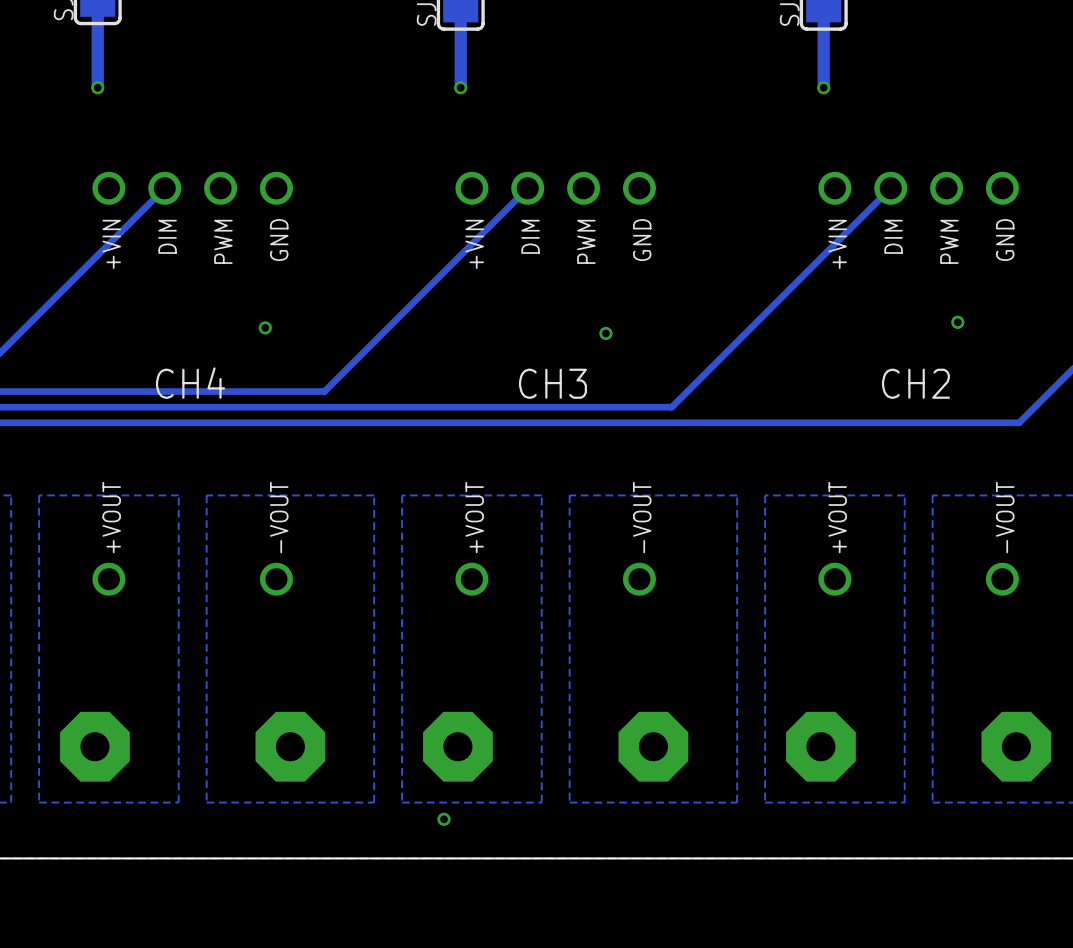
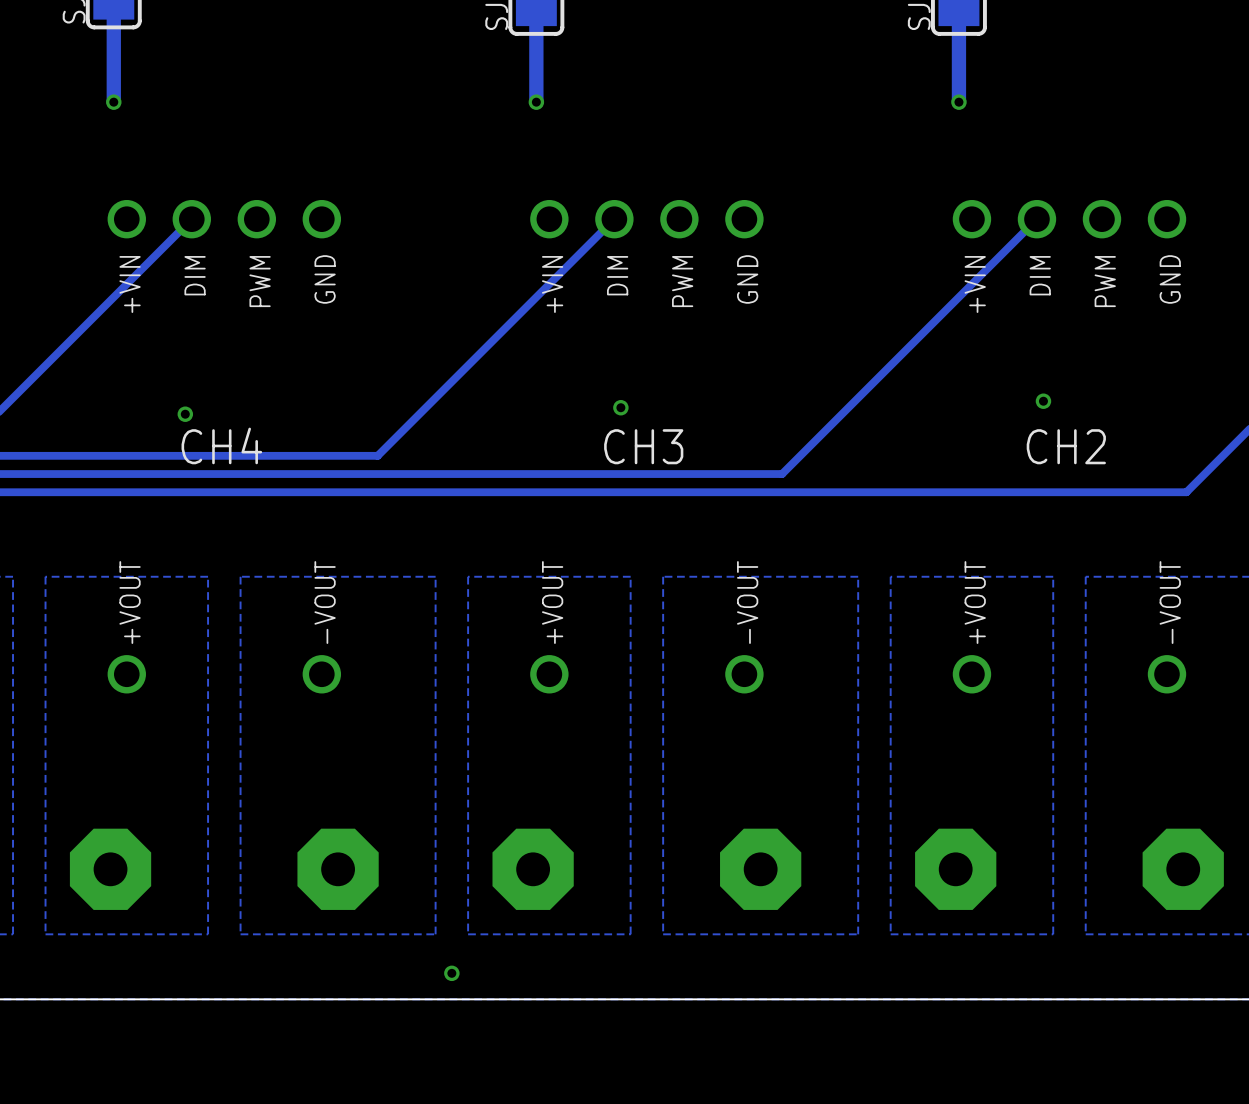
via position: (957, 322) -> (1043, 401)
via position: (265, 327) -> (185, 414)
via position: (605, 333) -> (620, 407)
via position: (443, 819) -> (451, 973)

